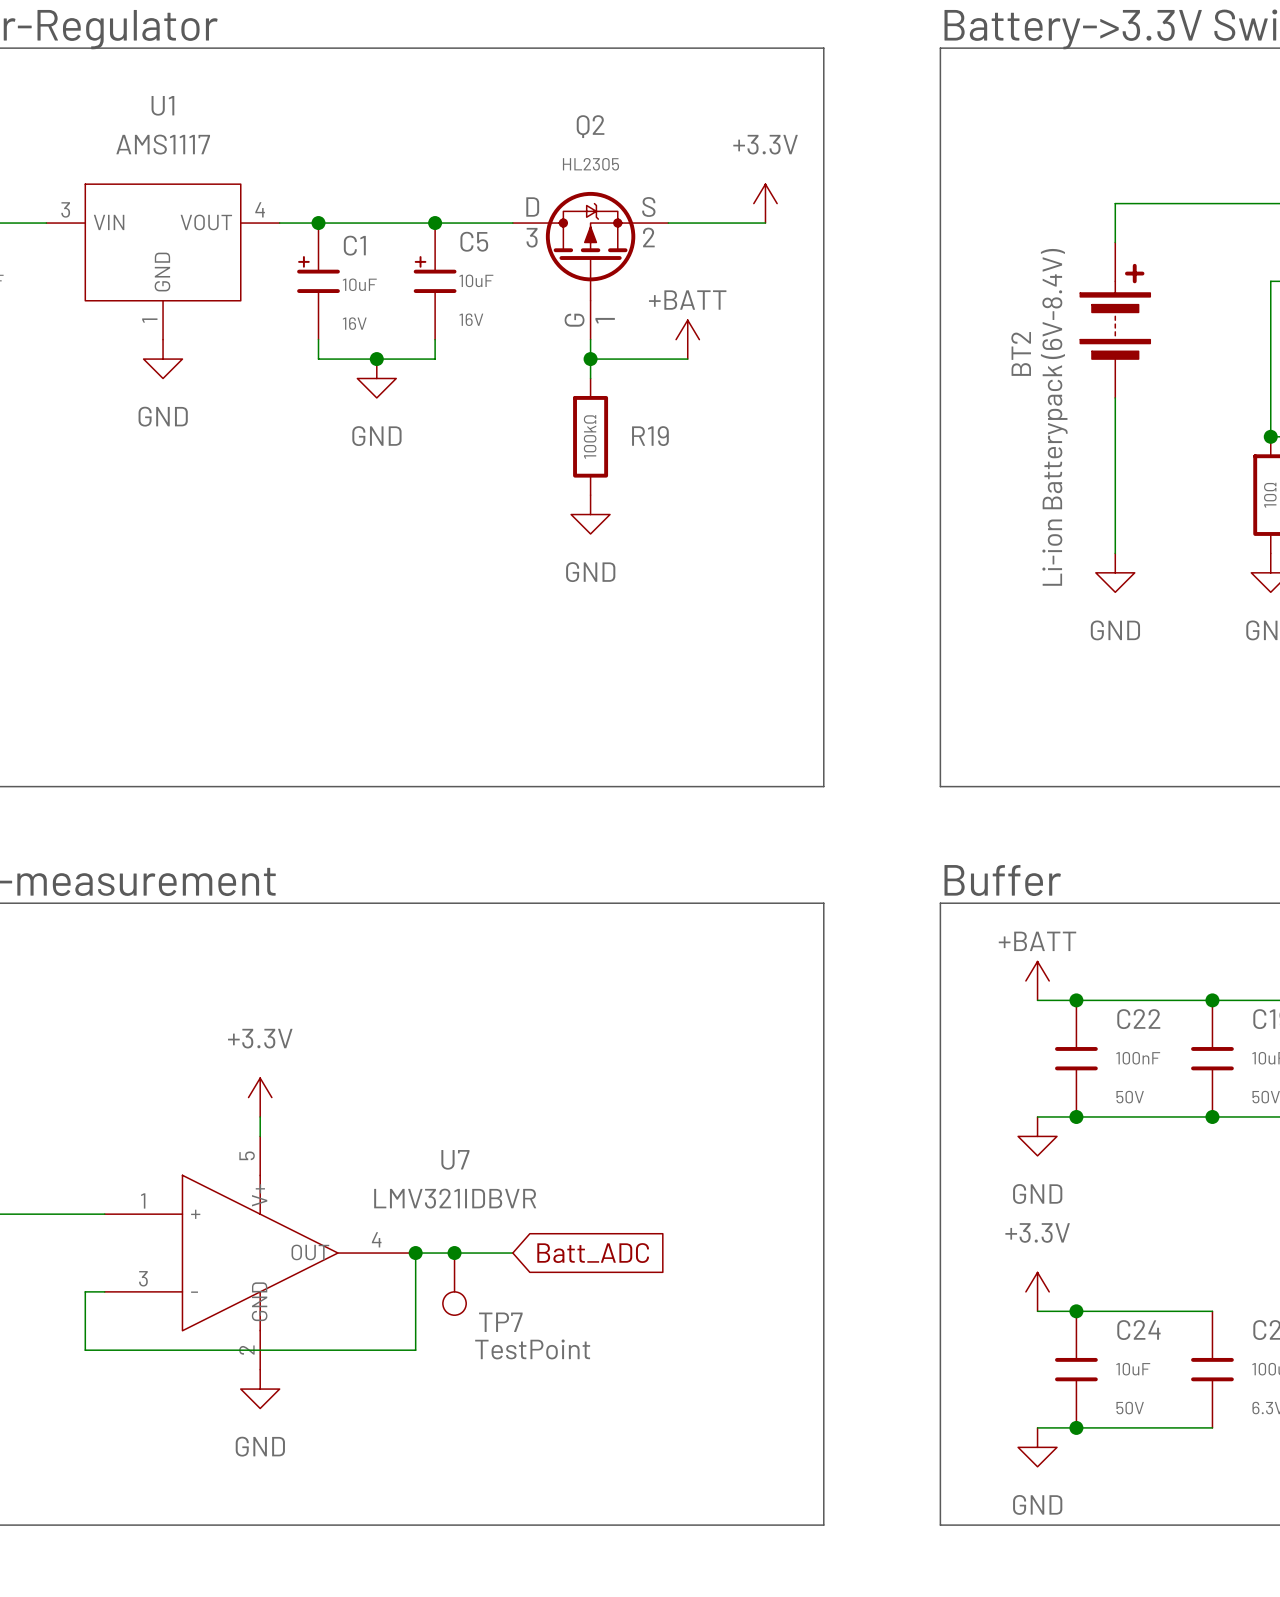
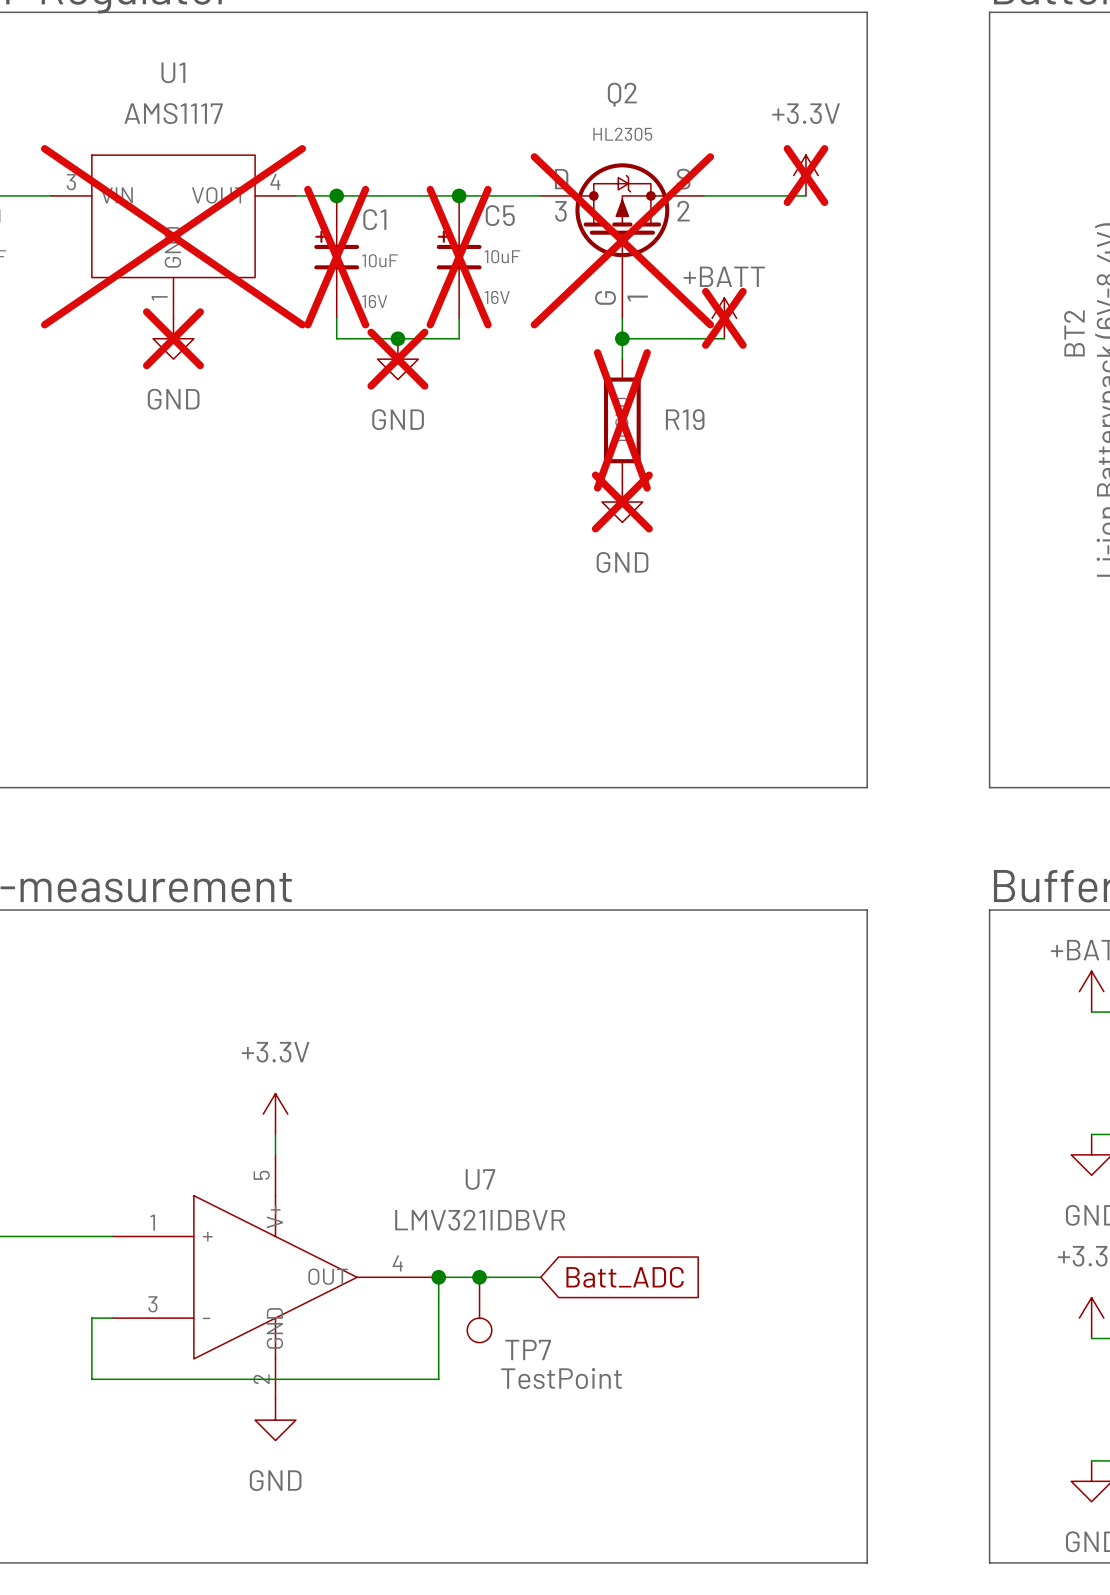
power symbol do-not-place cross: none -> (805, 175)
U1 do-not-place cross: none -> (173, 236)
Q2 do-not-place cross: none -> (622, 240)
C1 do-not-place cross: none -> (336, 257)
C5 do-not-place cross: none -> (459, 257)
power symbol do-not-place cross: none -> (724, 318)
power symbol do-not-place cross: none -> (173, 338)
power symbol do-not-place cross: none -> (397, 359)
R19 do-not-place cross: none -> (622, 420)
power symbol do-not-place cross: none -> (622, 501)

